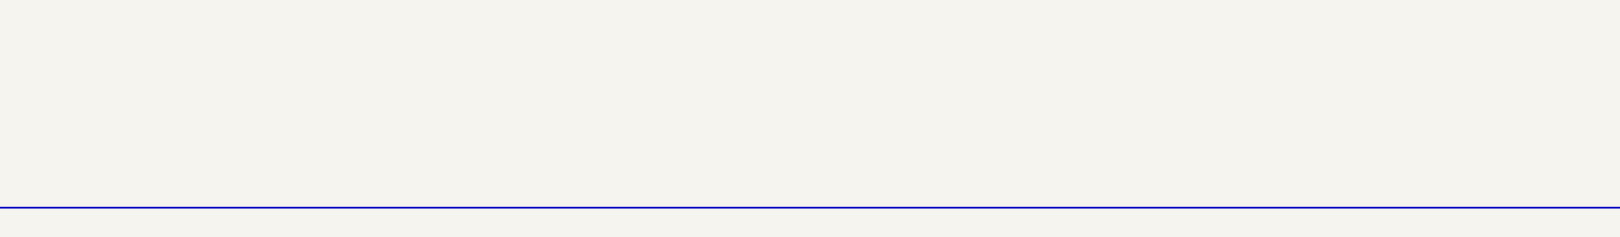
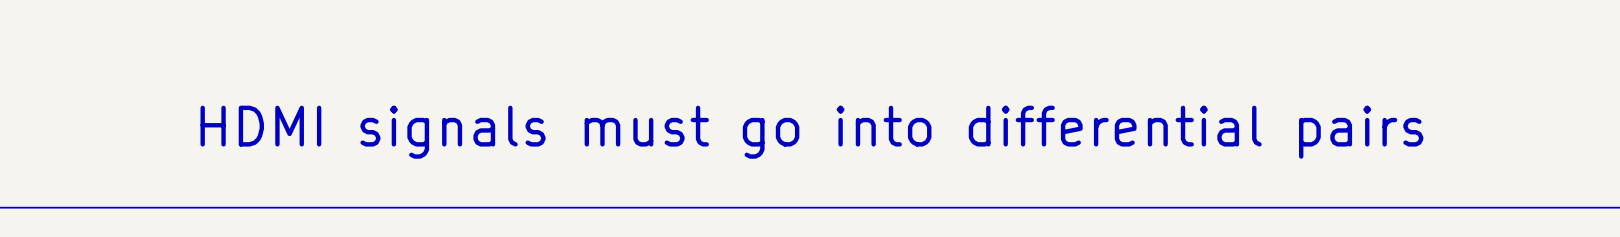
text: none -> HDMI signals must go into differential pairs (811, 132)

